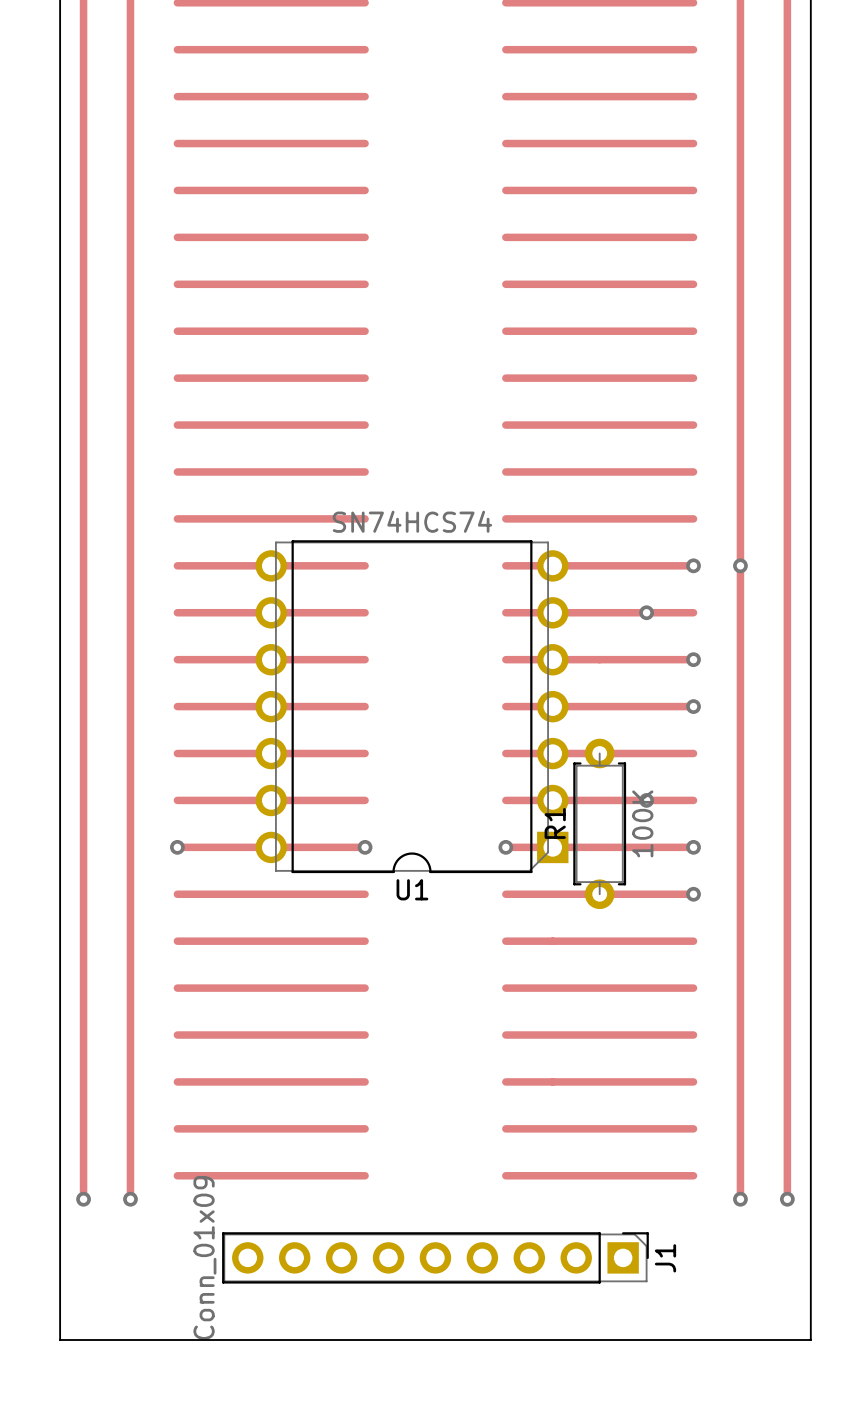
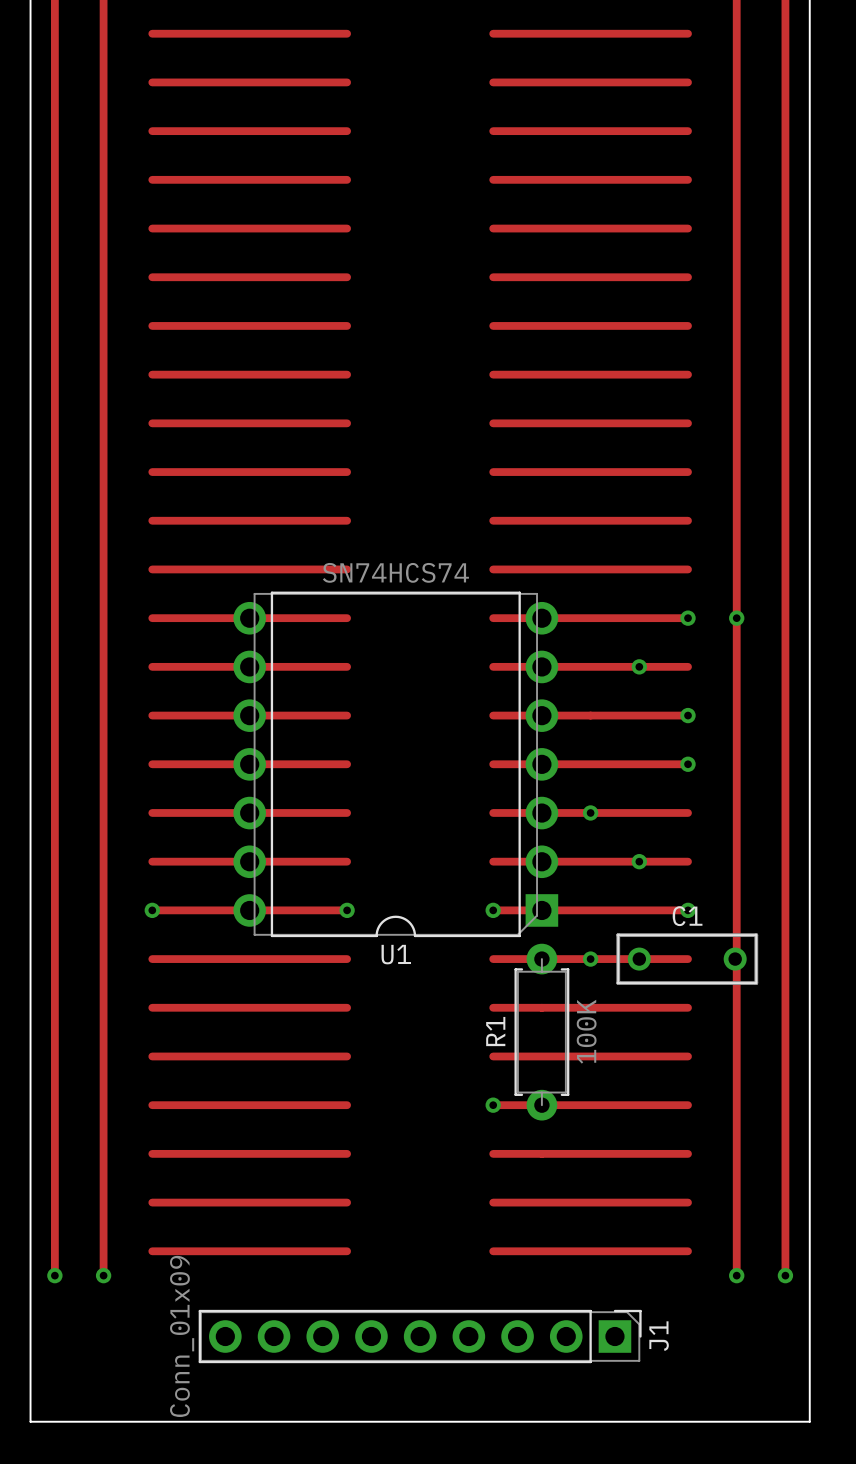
via: none -> (590, 812)
R1 position: (599, 823) -> (541, 1032)
via: none -> (590, 959)
C1: none -> (687, 959)
via: (693, 894) -> none
via: none -> (493, 1105)

